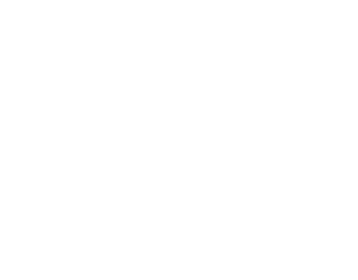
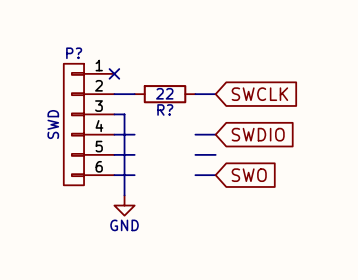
no-connect mark: none -> (114, 73)
wire: none -> (114, 94) (134, 94)
R?: none -> 22 (165, 94)
wire: none -> (195, 94) (215, 94)
global label: none -> SWCLK (259, 94)
wire: none -> (114, 114) (124, 114) (124, 195)
P?: none -> SWD (89, 124)
wire: none -> (114, 134) (134, 134)
wire: none -> (195, 134) (215, 134)
global label: none -> SWDIO (258, 134)
wire: none -> (114, 154) (134, 154)
wire: none -> (195, 154) (215, 154)
wire: none -> (114, 175) (134, 175)
wire: none -> (195, 175) (215, 175)
global label: none -> SWO (249, 175)
power symbol: none -> GND (124, 205)

